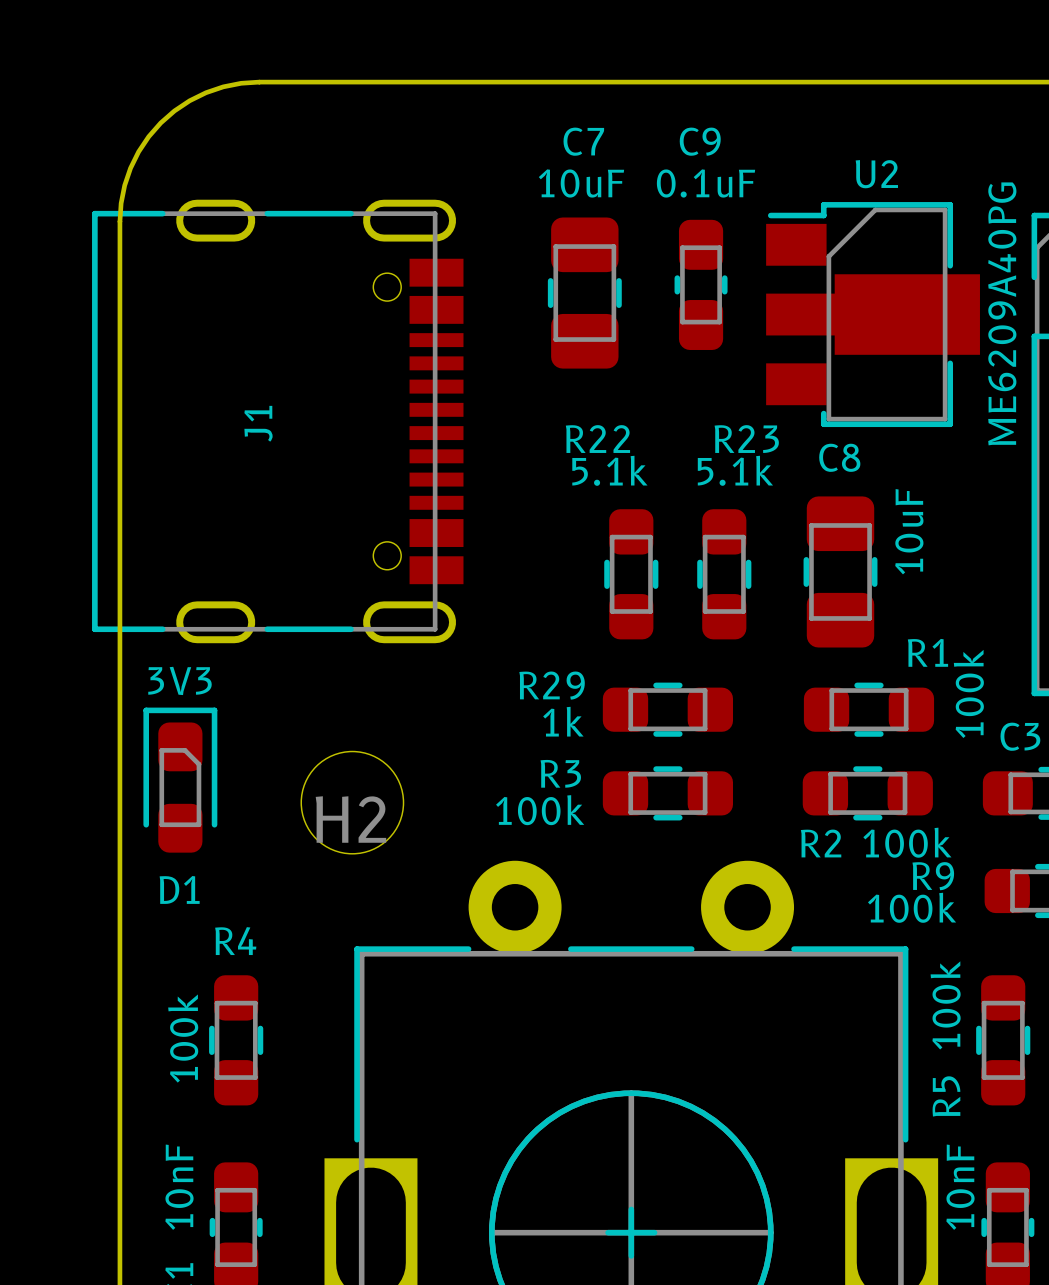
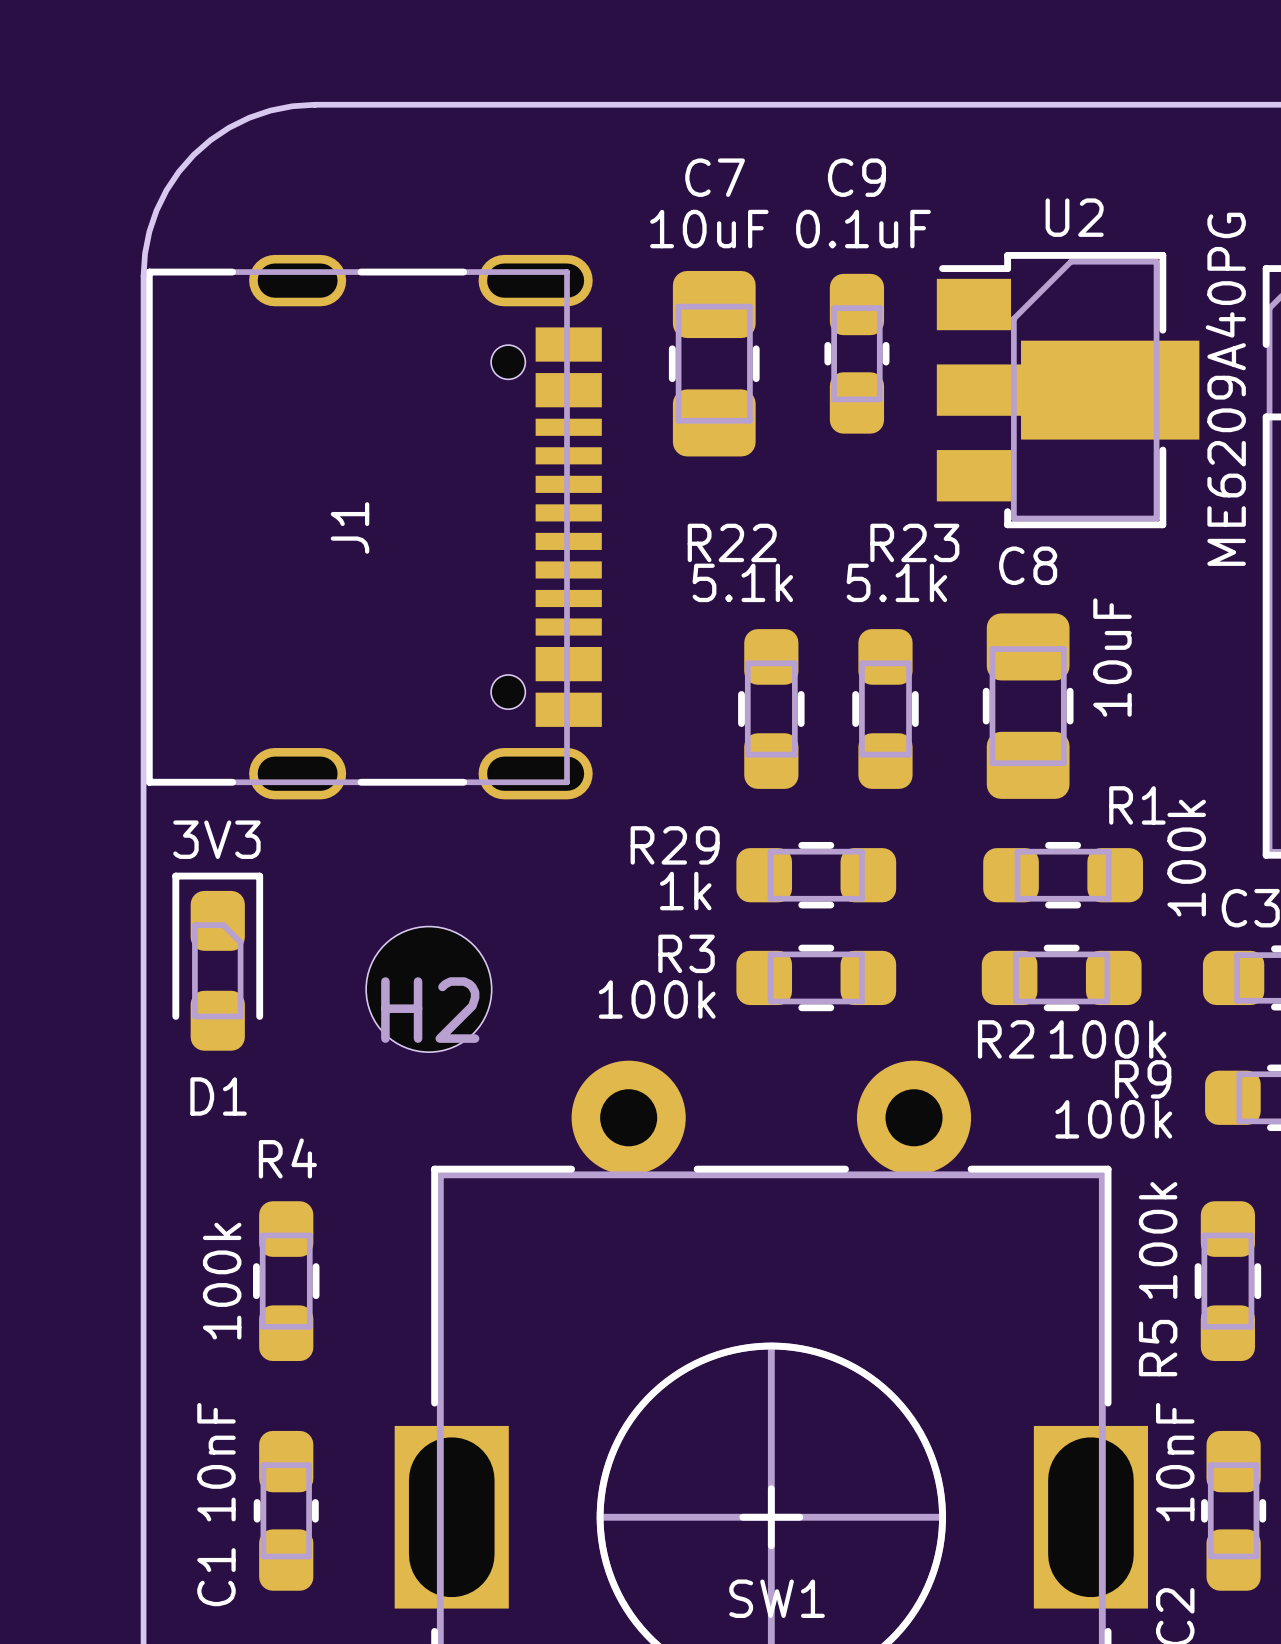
J1 position: (277, 421) -> (373, 527)

